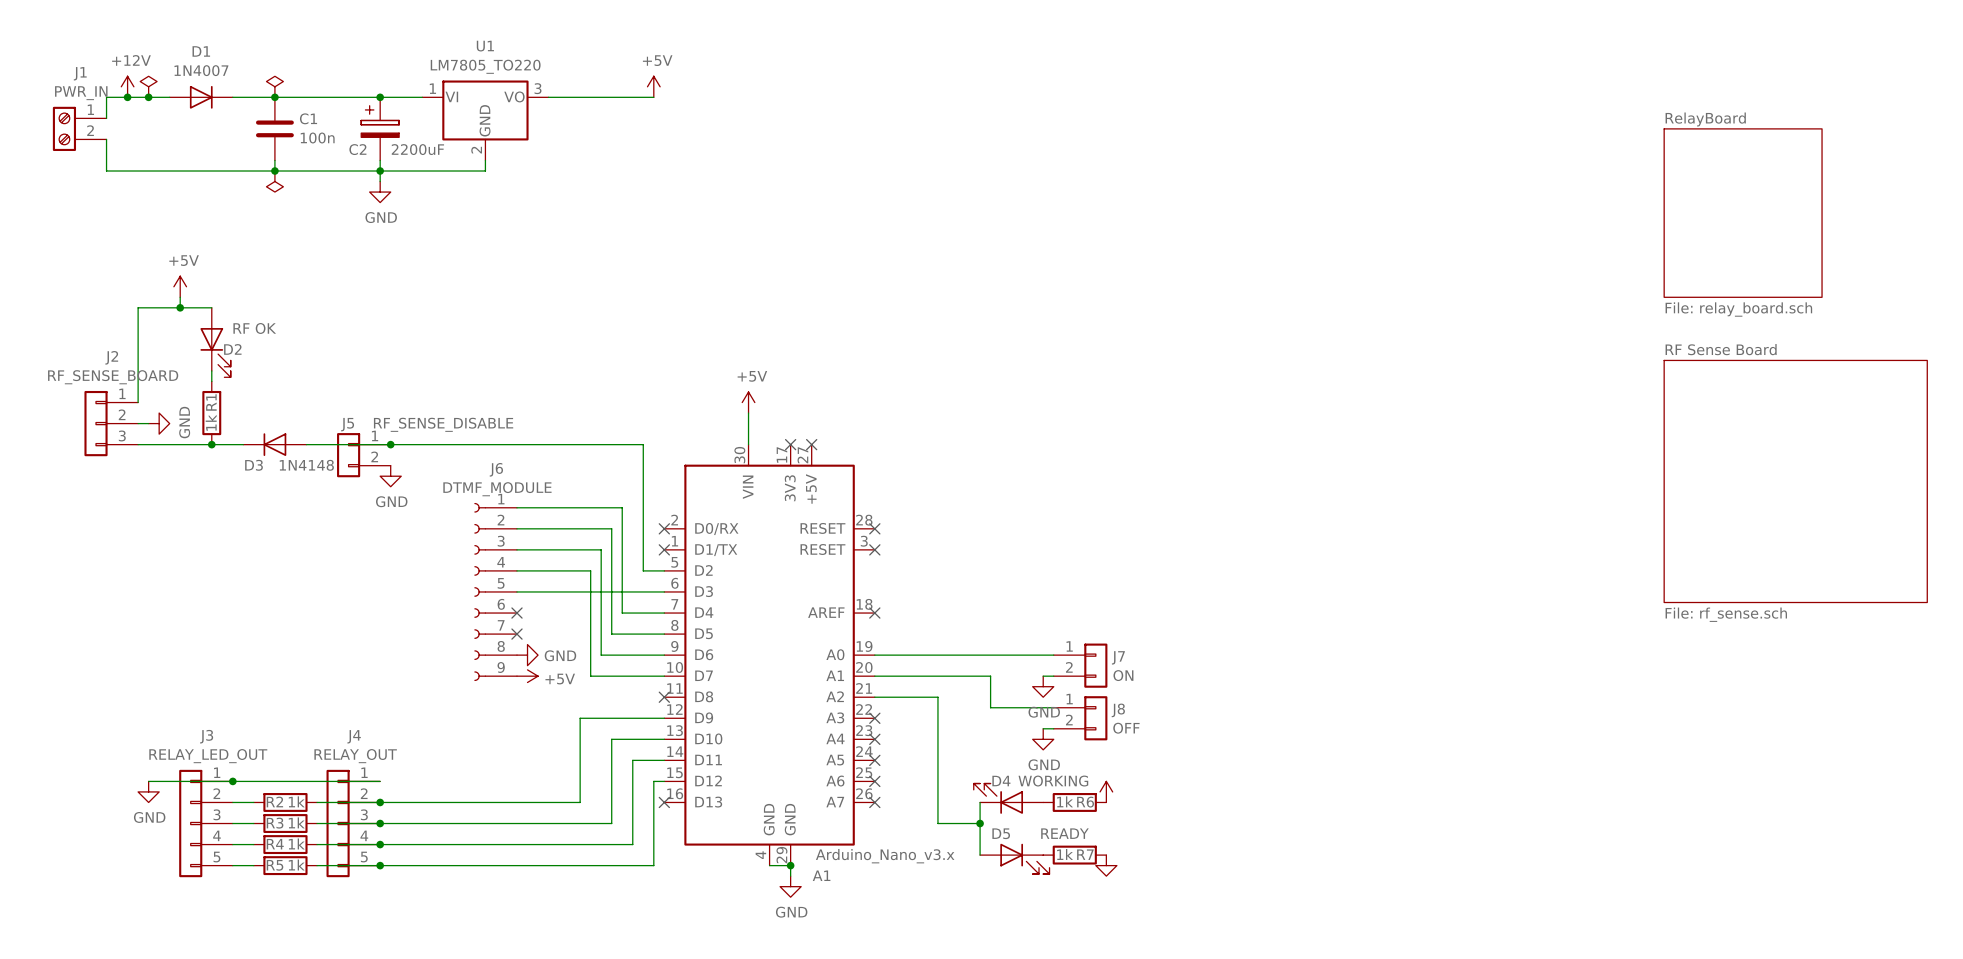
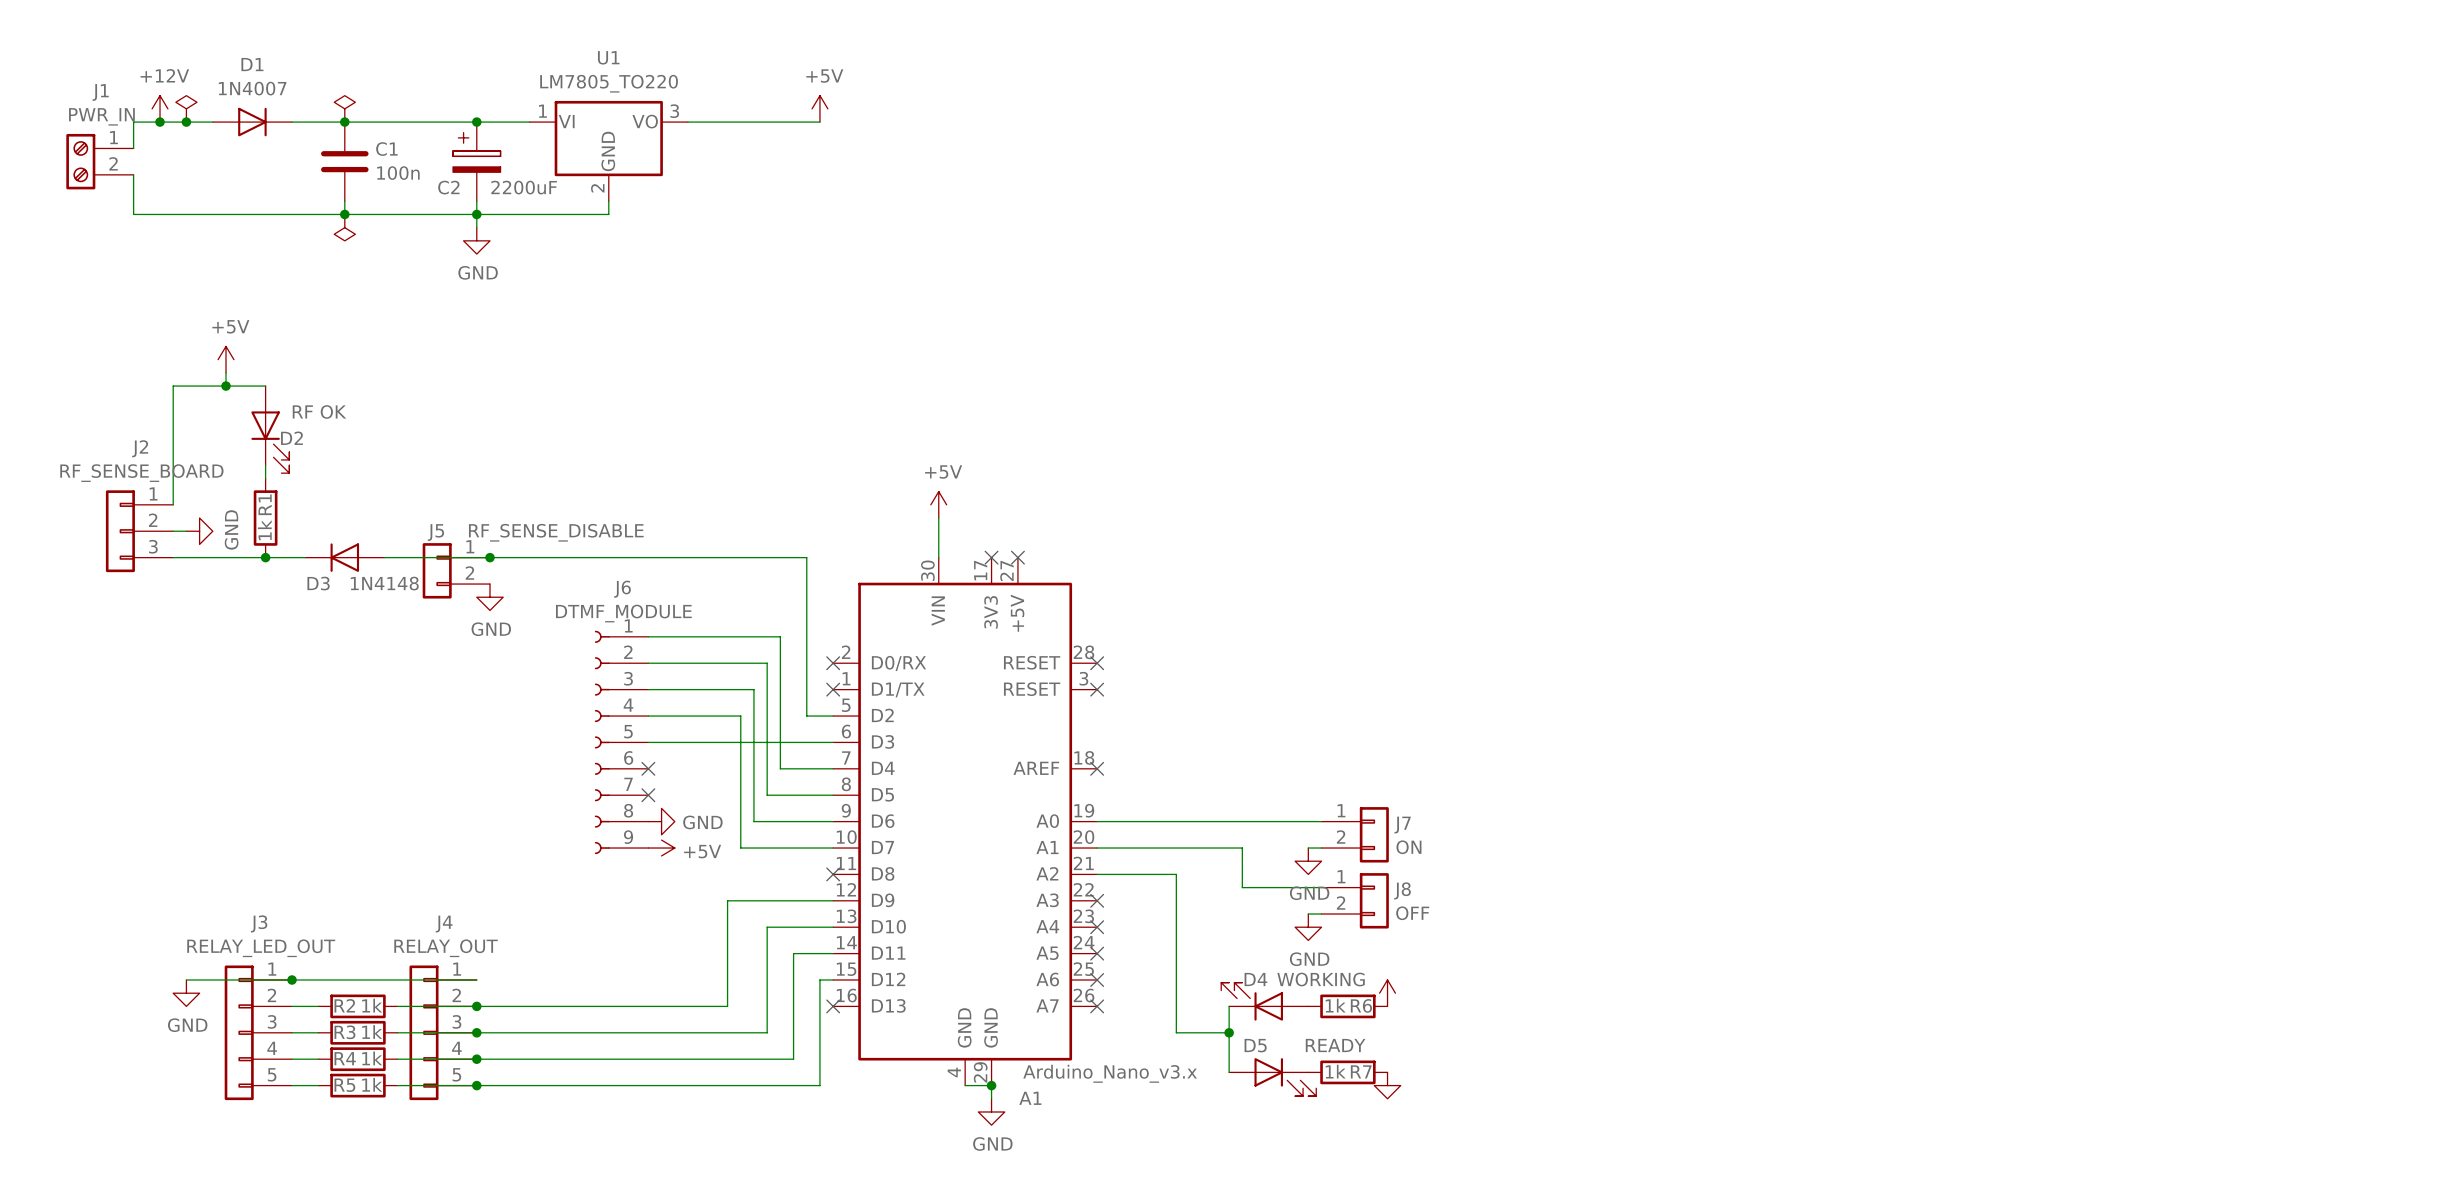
sheet RelayBoard: File: relay_board.sch (1743, 213) -> none
sheet RF Sense Board: File: rf_sense.sch (1795, 481) -> none

